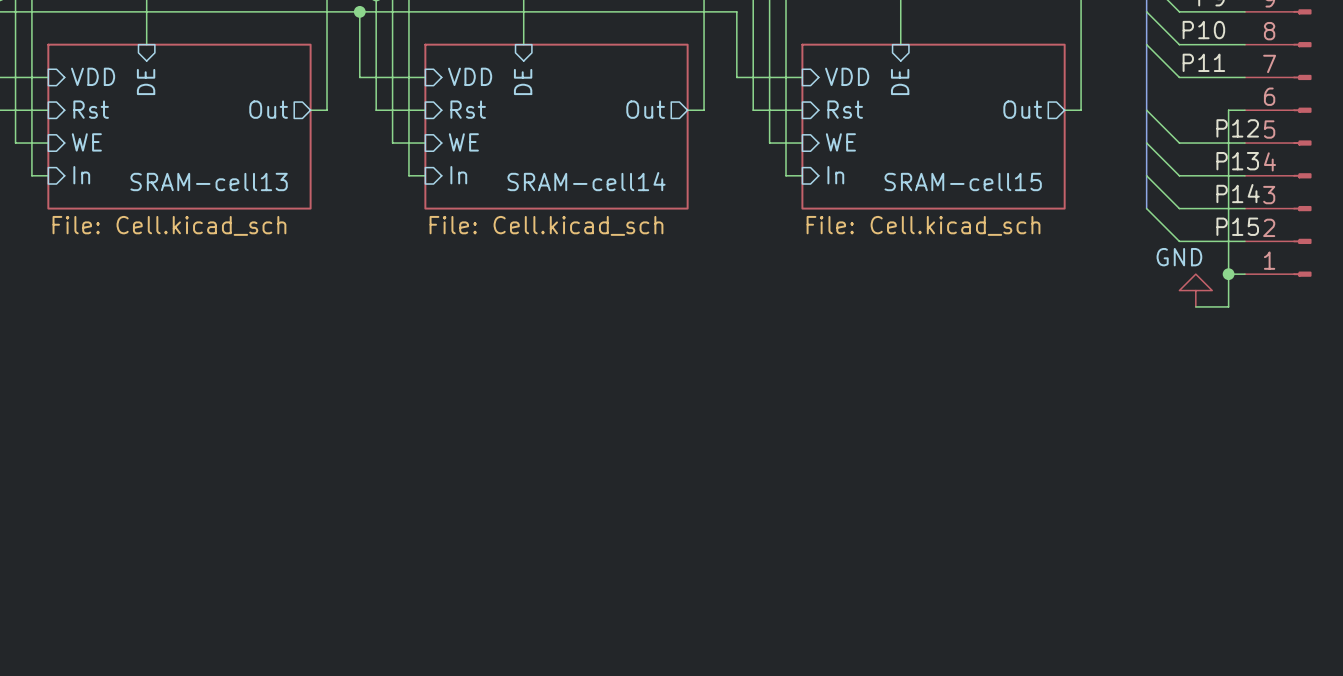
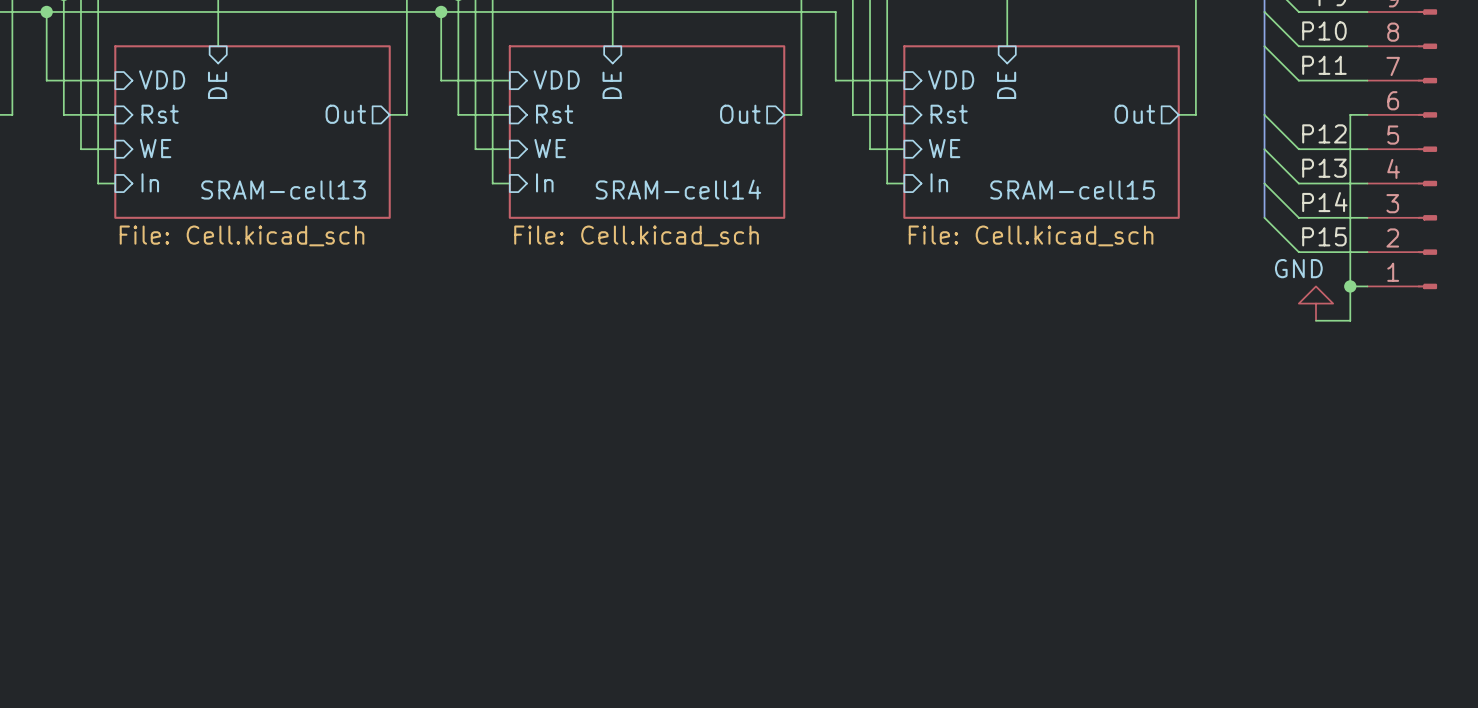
label position: P12 (1237, 128) -> P12 (1324, 133)
label position: P13 (1237, 161) -> P13 (1324, 168)
label position: P14 (1238, 193) -> P14 (1324, 202)
label position: P15 (1237, 226) -> P15 (1324, 236)

